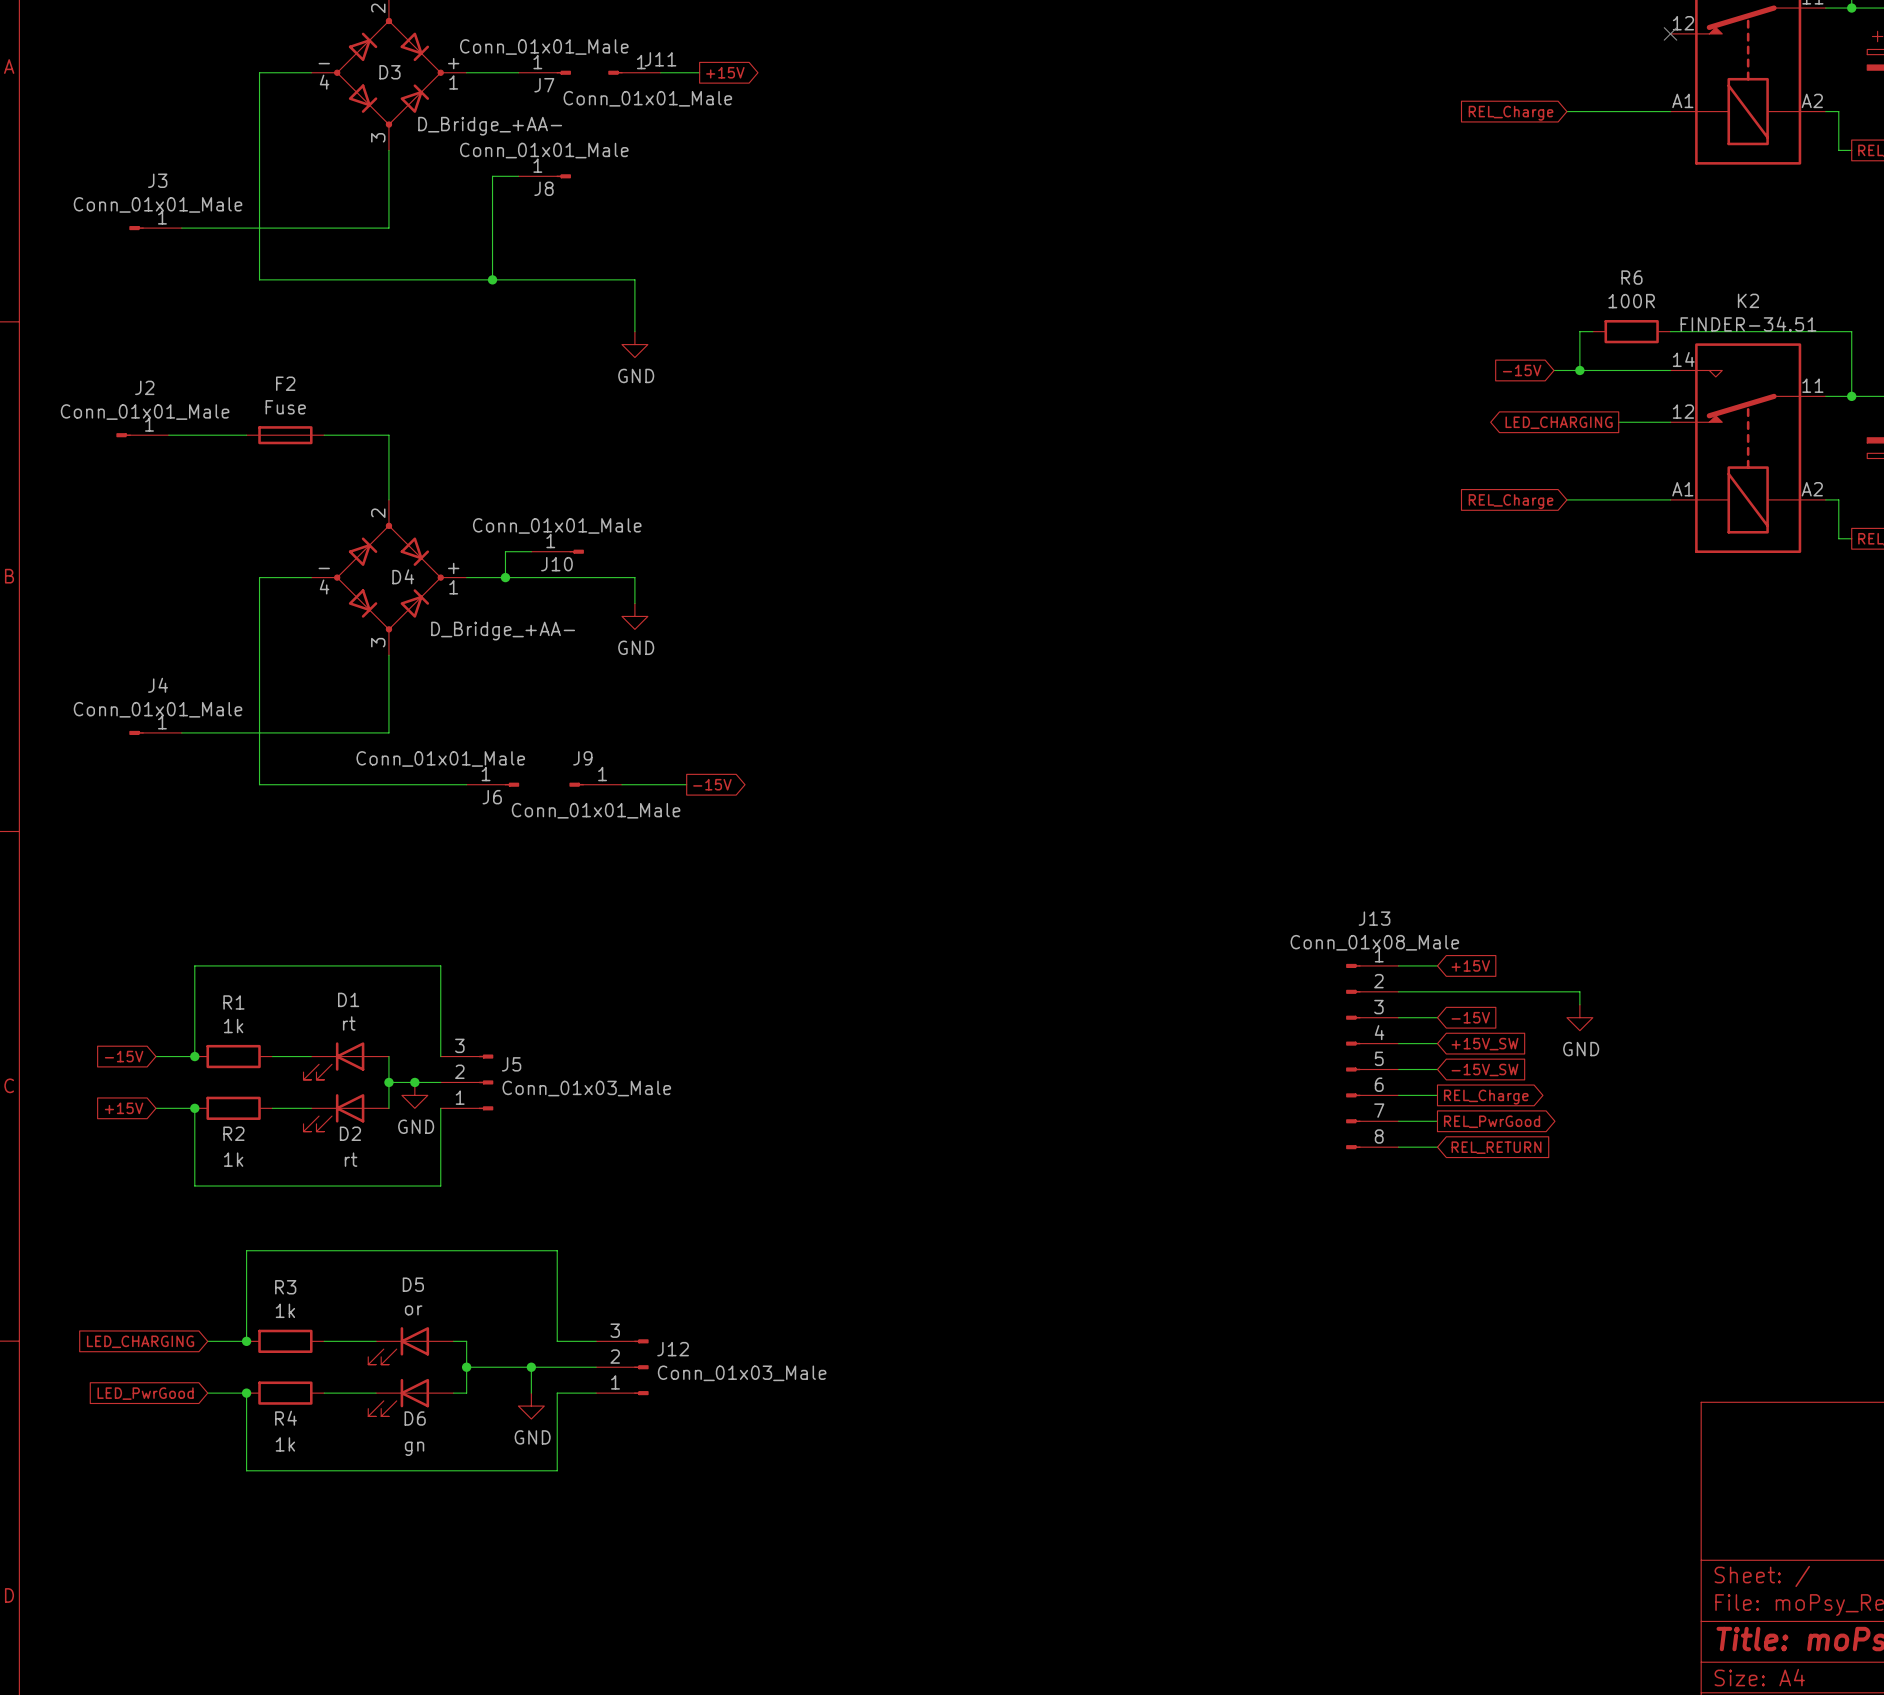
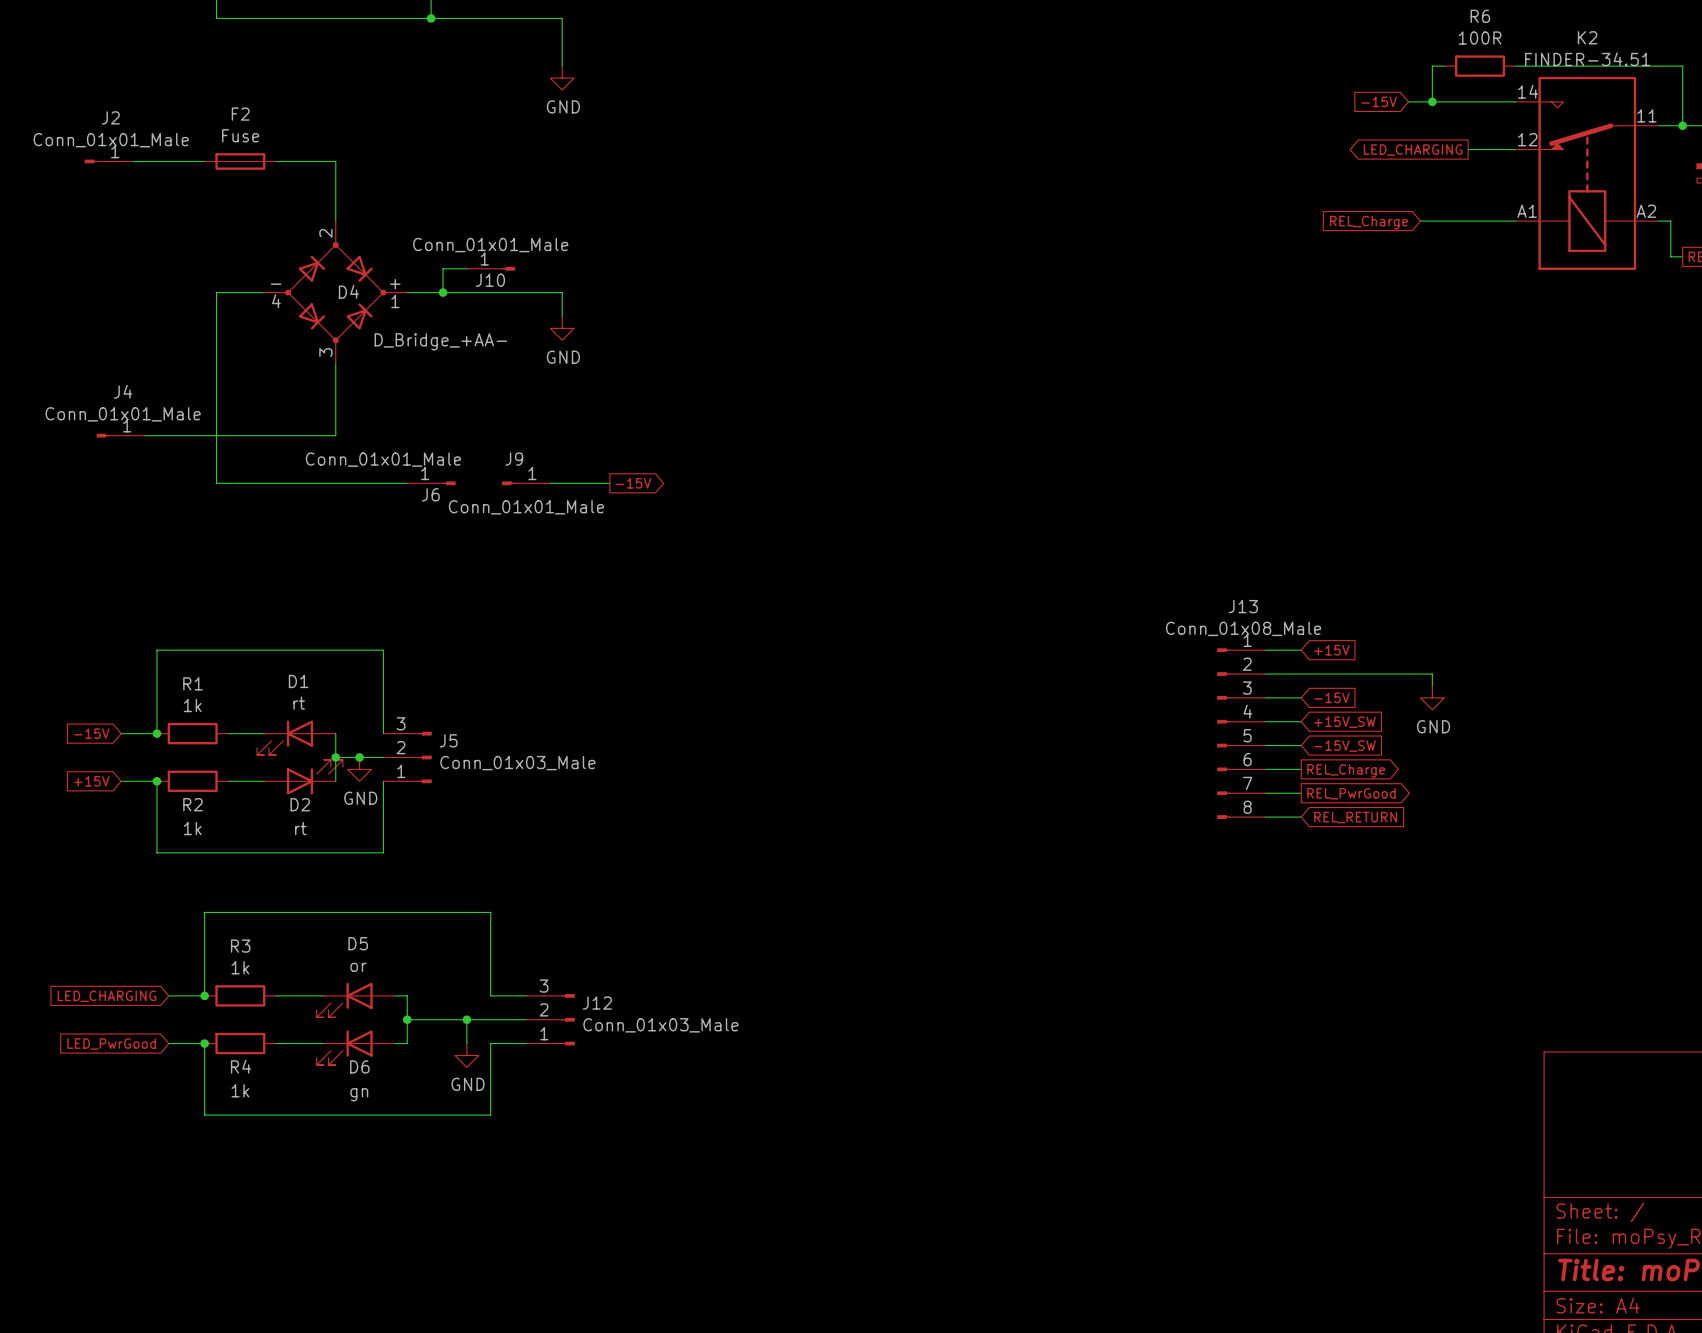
D2 rotation: 0° (333, 1112) -> 180° (314, 777)

